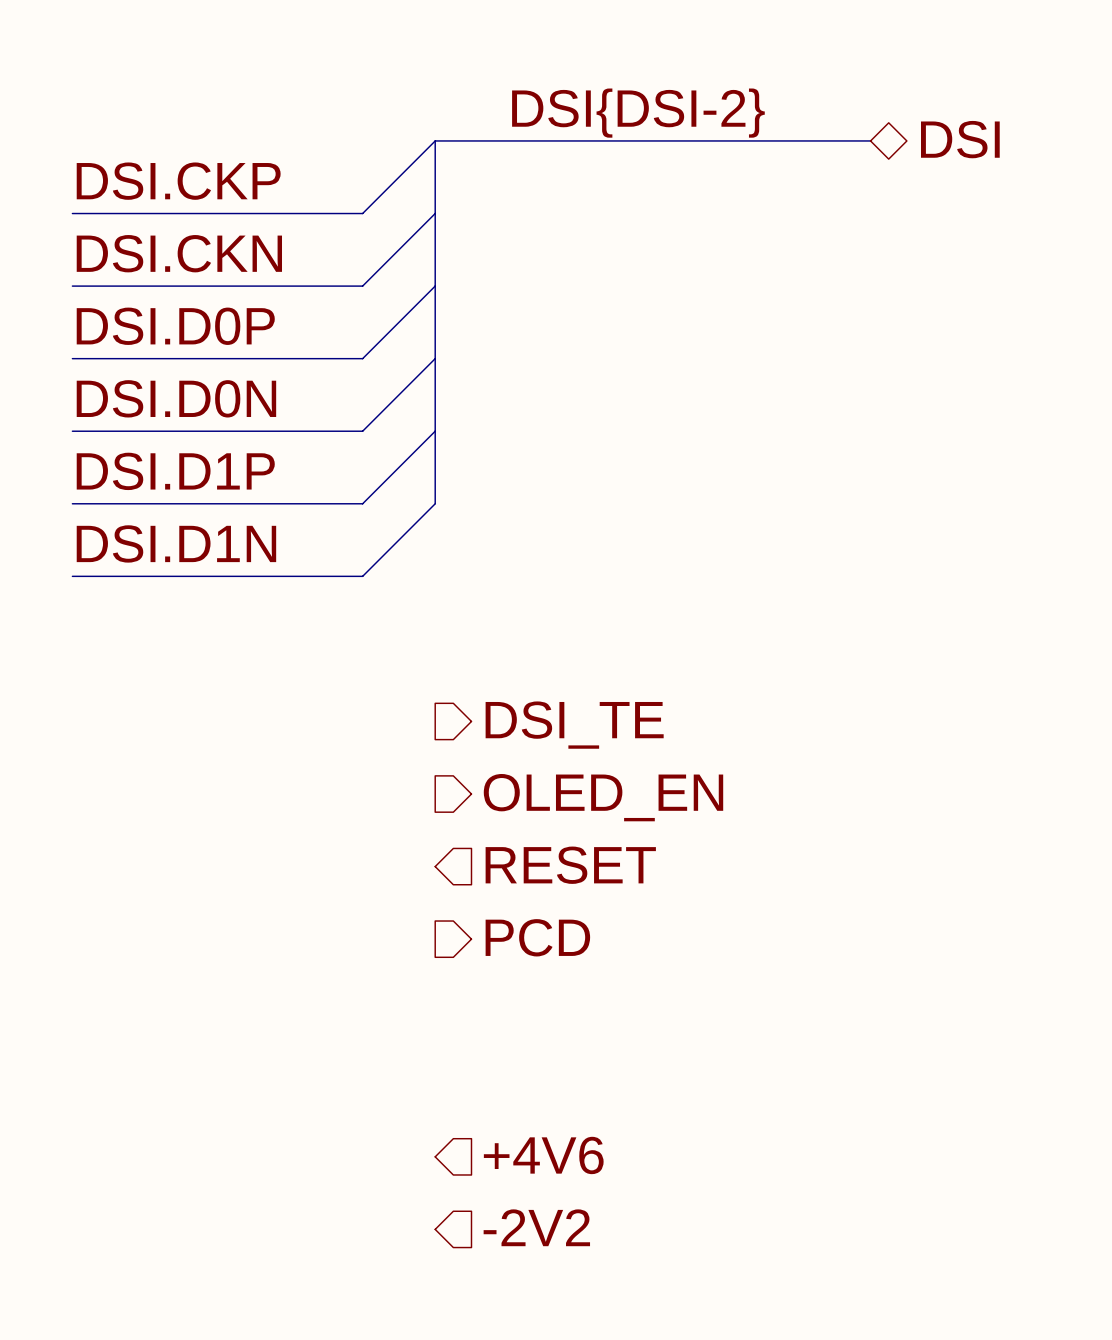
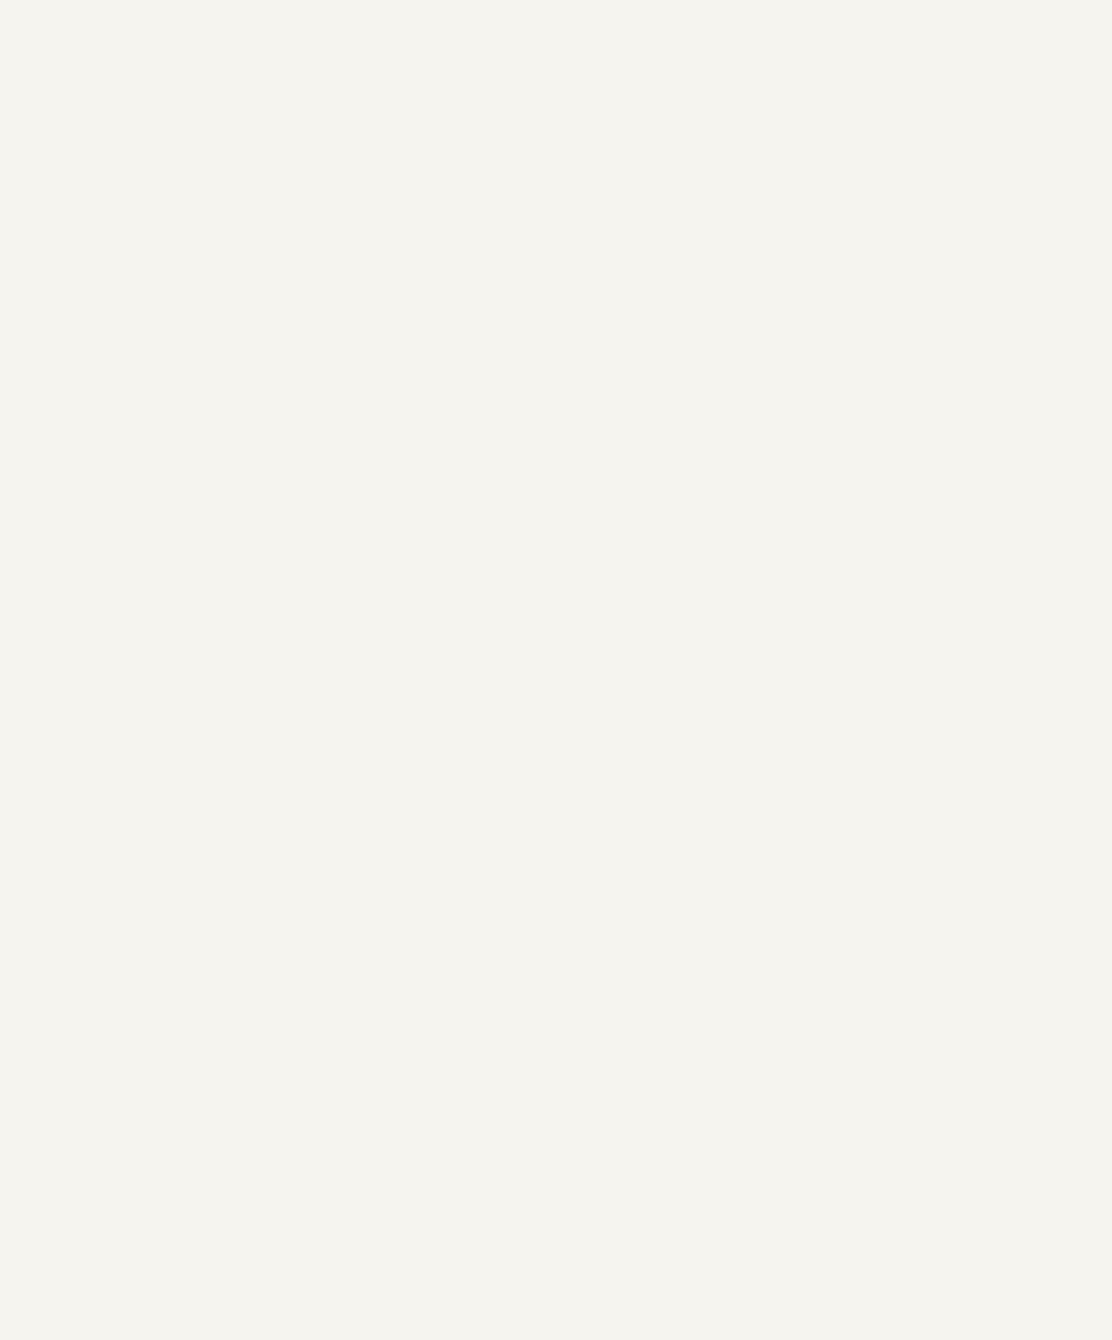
label: DSI{DSI-2} (638, 113) -> none
hierarchical label: DSI (960, 139) -> none
wire: (435, 140) (362, 213) (72, 213) -> none
bus: (870, 140) (435, 140) (435, 503) -> none
label: DSI.CKP (178, 181) -> none
wire: (435, 213) (362, 286) (72, 286) -> none
label: DSI.CKN (179, 253) -> none
wire: (435, 286) (362, 358) (72, 358) -> none
label: DSI.D0P (175, 326) -> none
wire: (435, 358) (362, 431) (72, 431) -> none
label: DSI.D0N (176, 398) -> none
wire: (435, 431) (362, 503) (72, 503) -> none
label: DSI.D1P (175, 471) -> none
wire: (435, 503) (362, 576) (72, 576) -> none
label: DSI.D1N (176, 543) -> none
hierarchical label: DSI_TE (574, 725) -> none
hierarchical label: OLED_EN (603, 797) -> none
hierarchical label: RESET (570, 865) -> none
hierarchical label: PCD (537, 937) -> none
hierarchical label: +4V6 (543, 1155) -> none
hierarchical label: -2V2 (536, 1227) -> none

